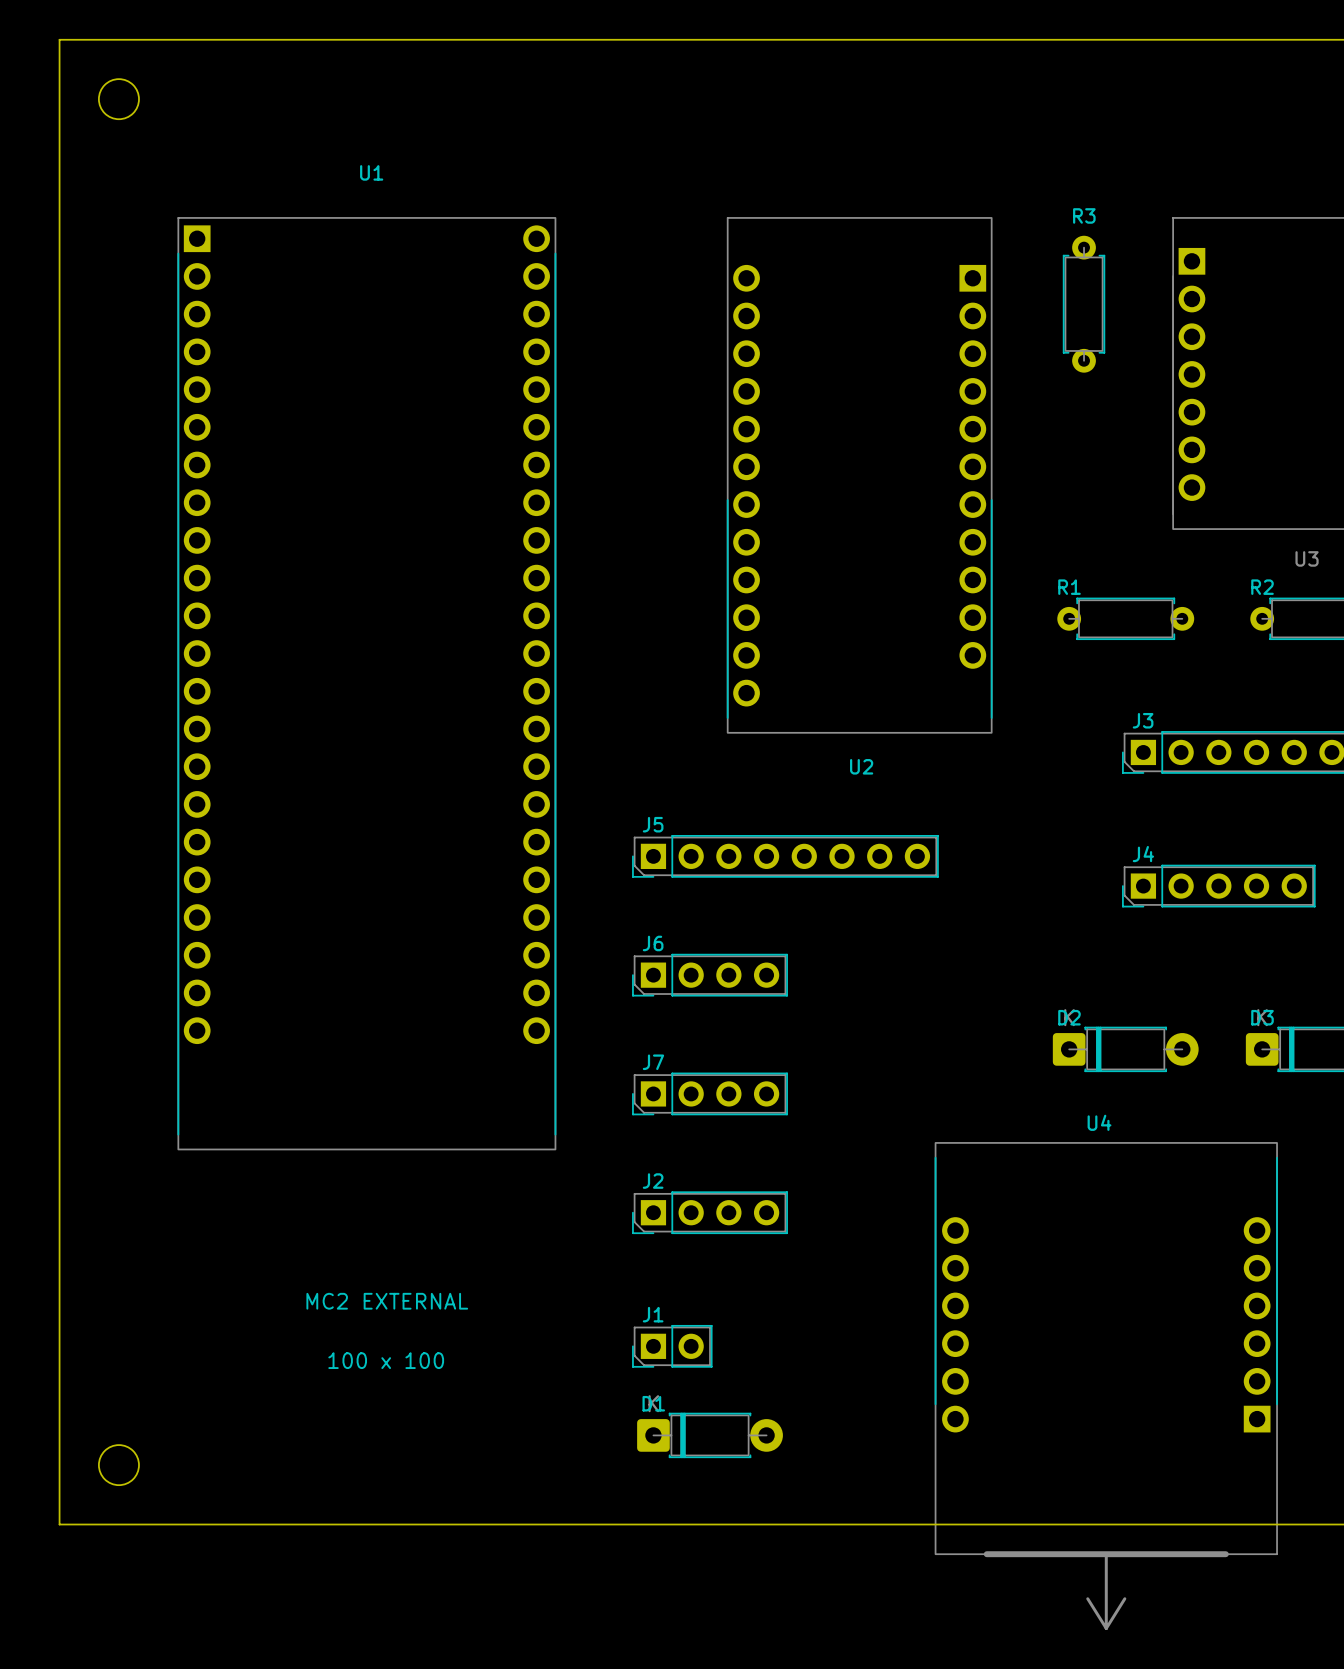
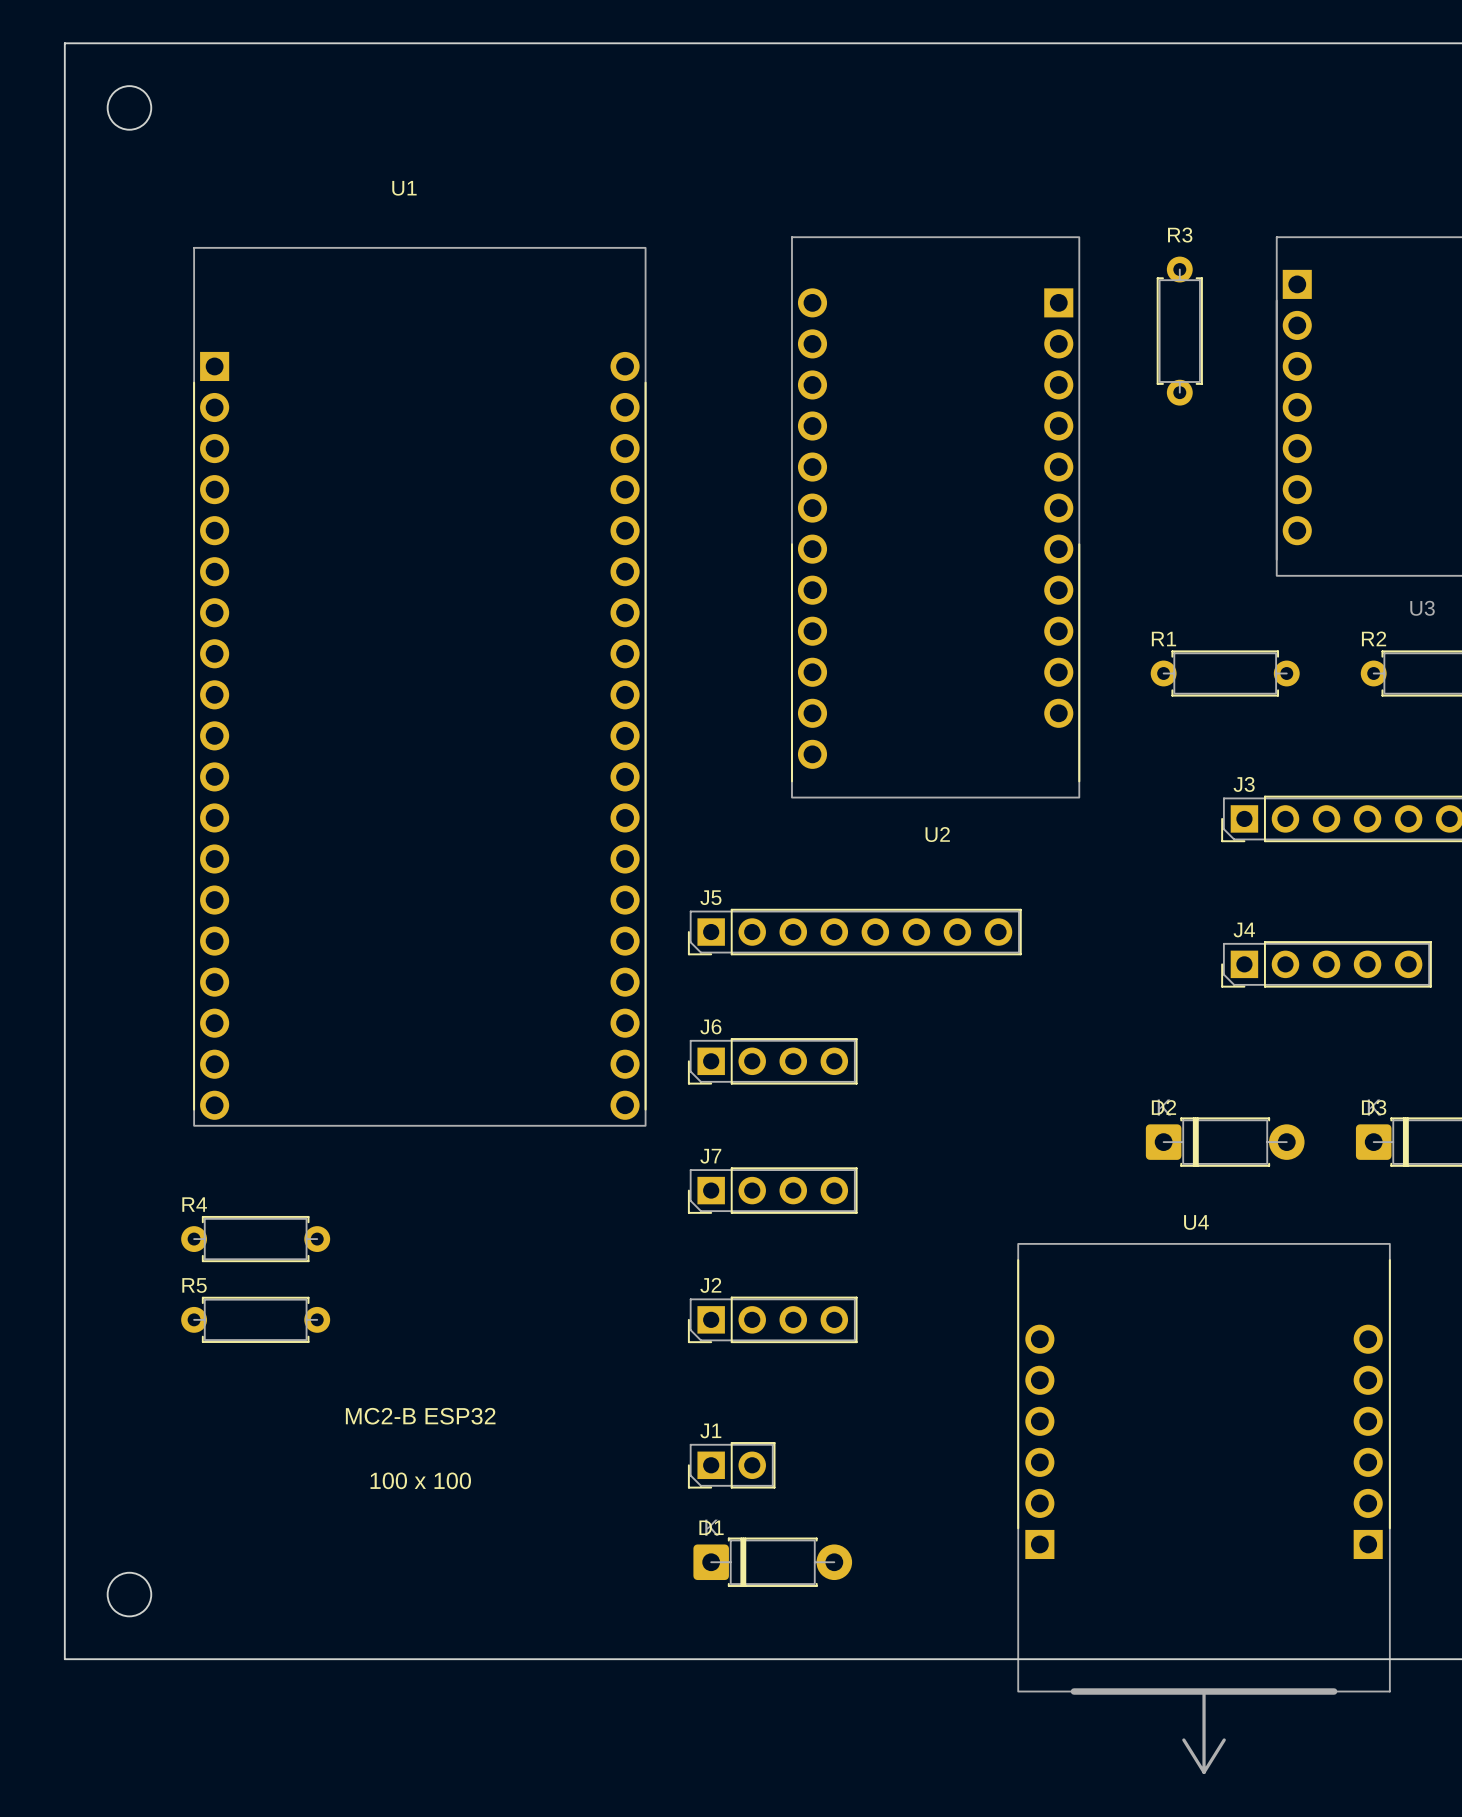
U1 footprint: [177, 217, 557, 1150] -> [193, 247, 647, 1127]
R4: none -> (255, 1239)
U4 footprint: [934, 1142, 1278, 1630] -> [1017, 1243, 1391, 1774]
R5: none -> (255, 1319)
text: MC2 EXTERNAL (387, 1301) -> MC2-B ESP32 (420, 1416)

